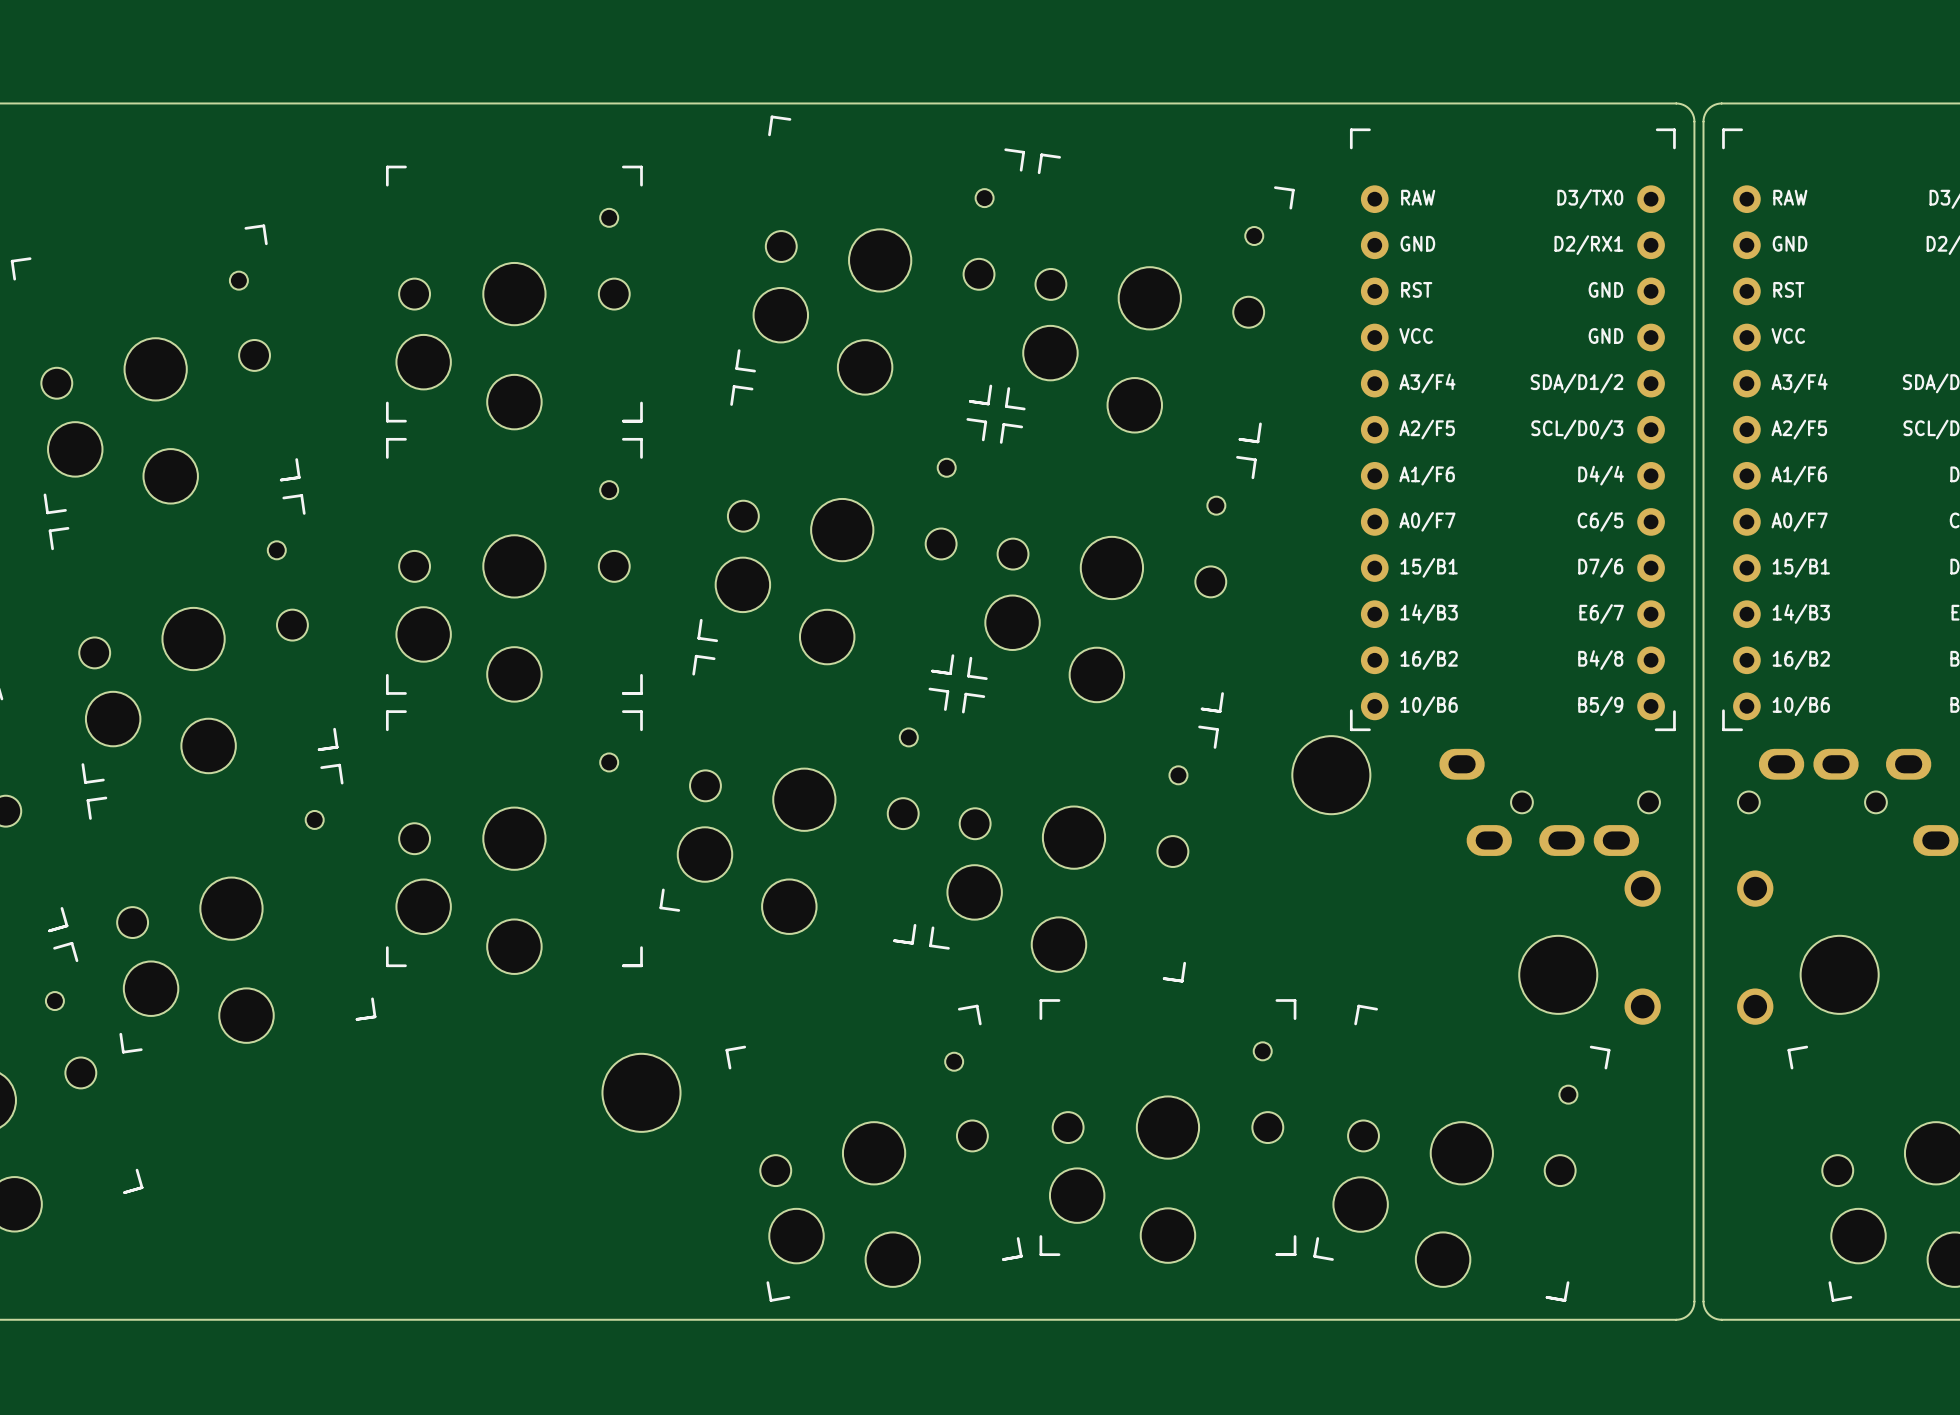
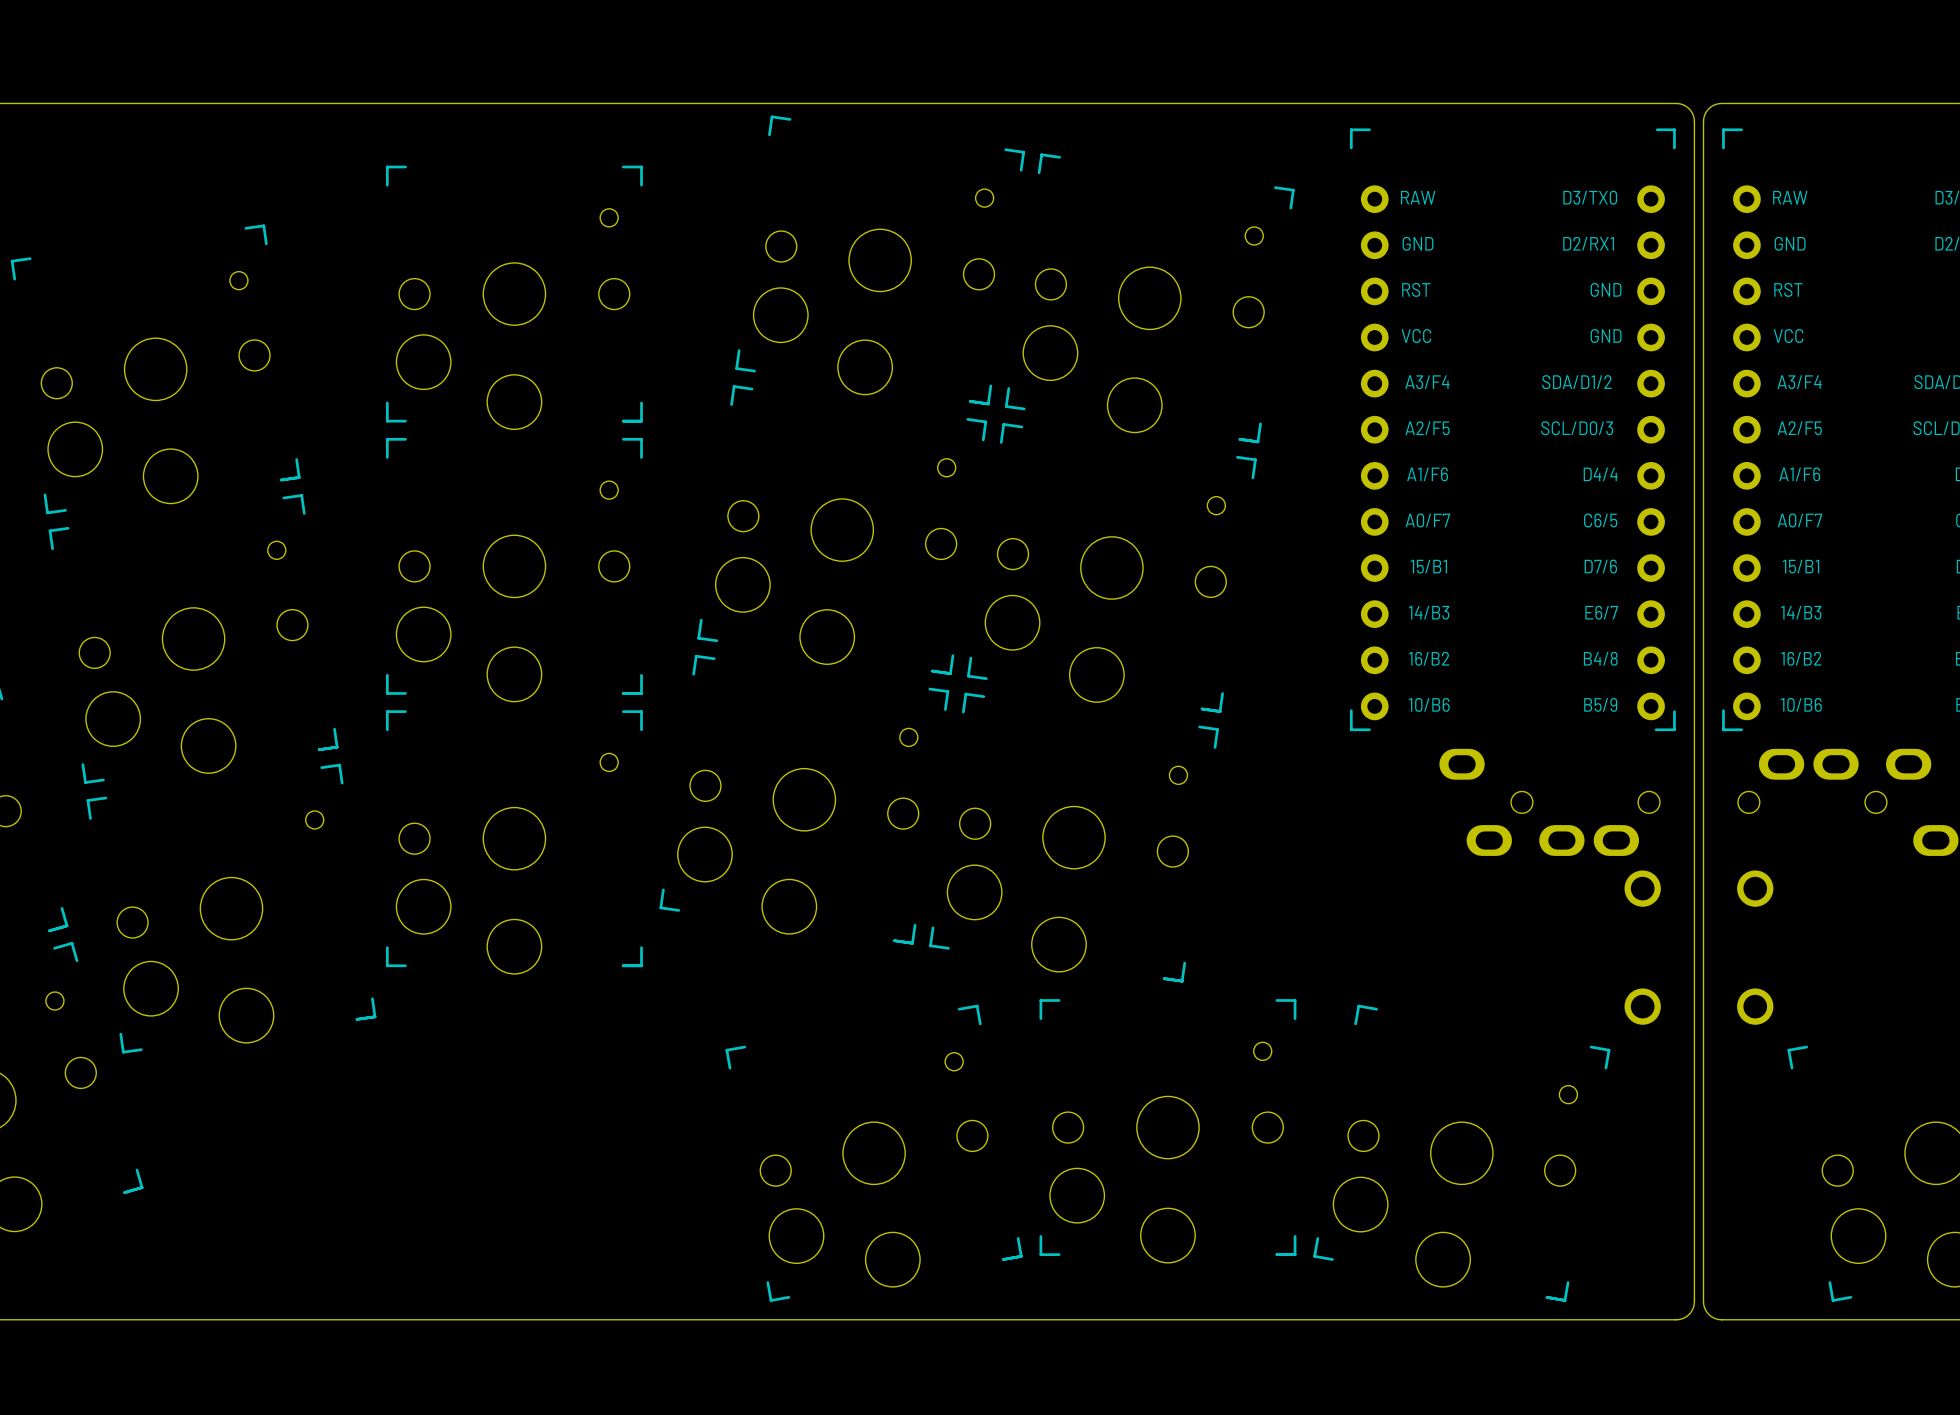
part: (1331, 775) -> none
part: (1558, 974) -> none
part: (1839, 974) -> none
part: (641, 1092) -> none

